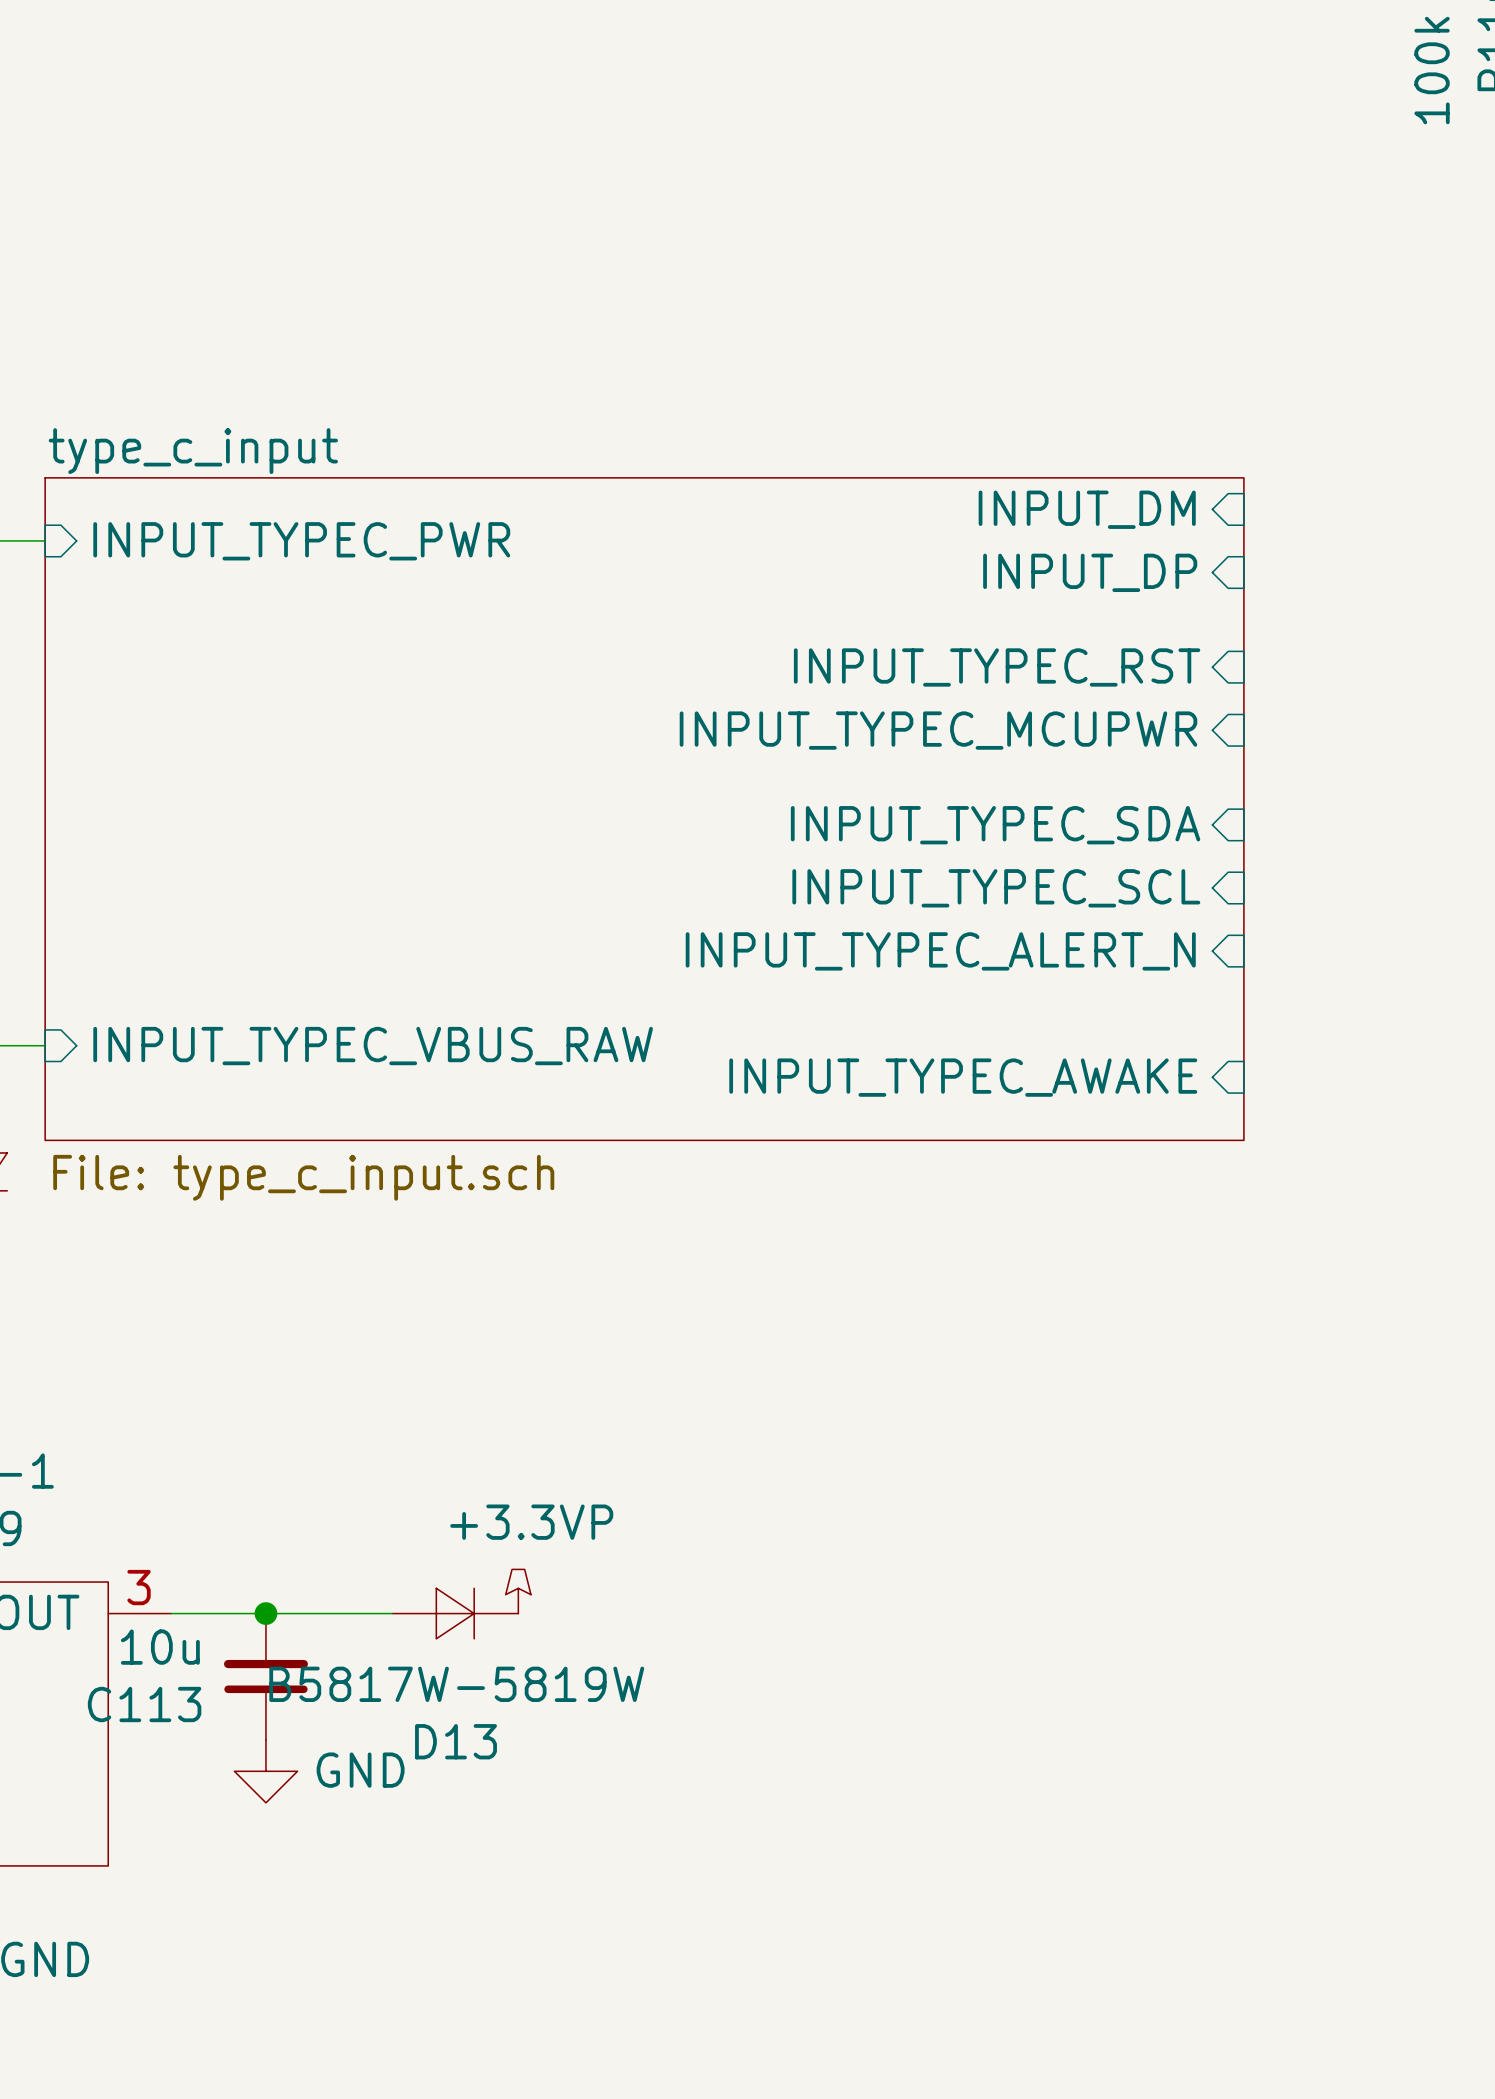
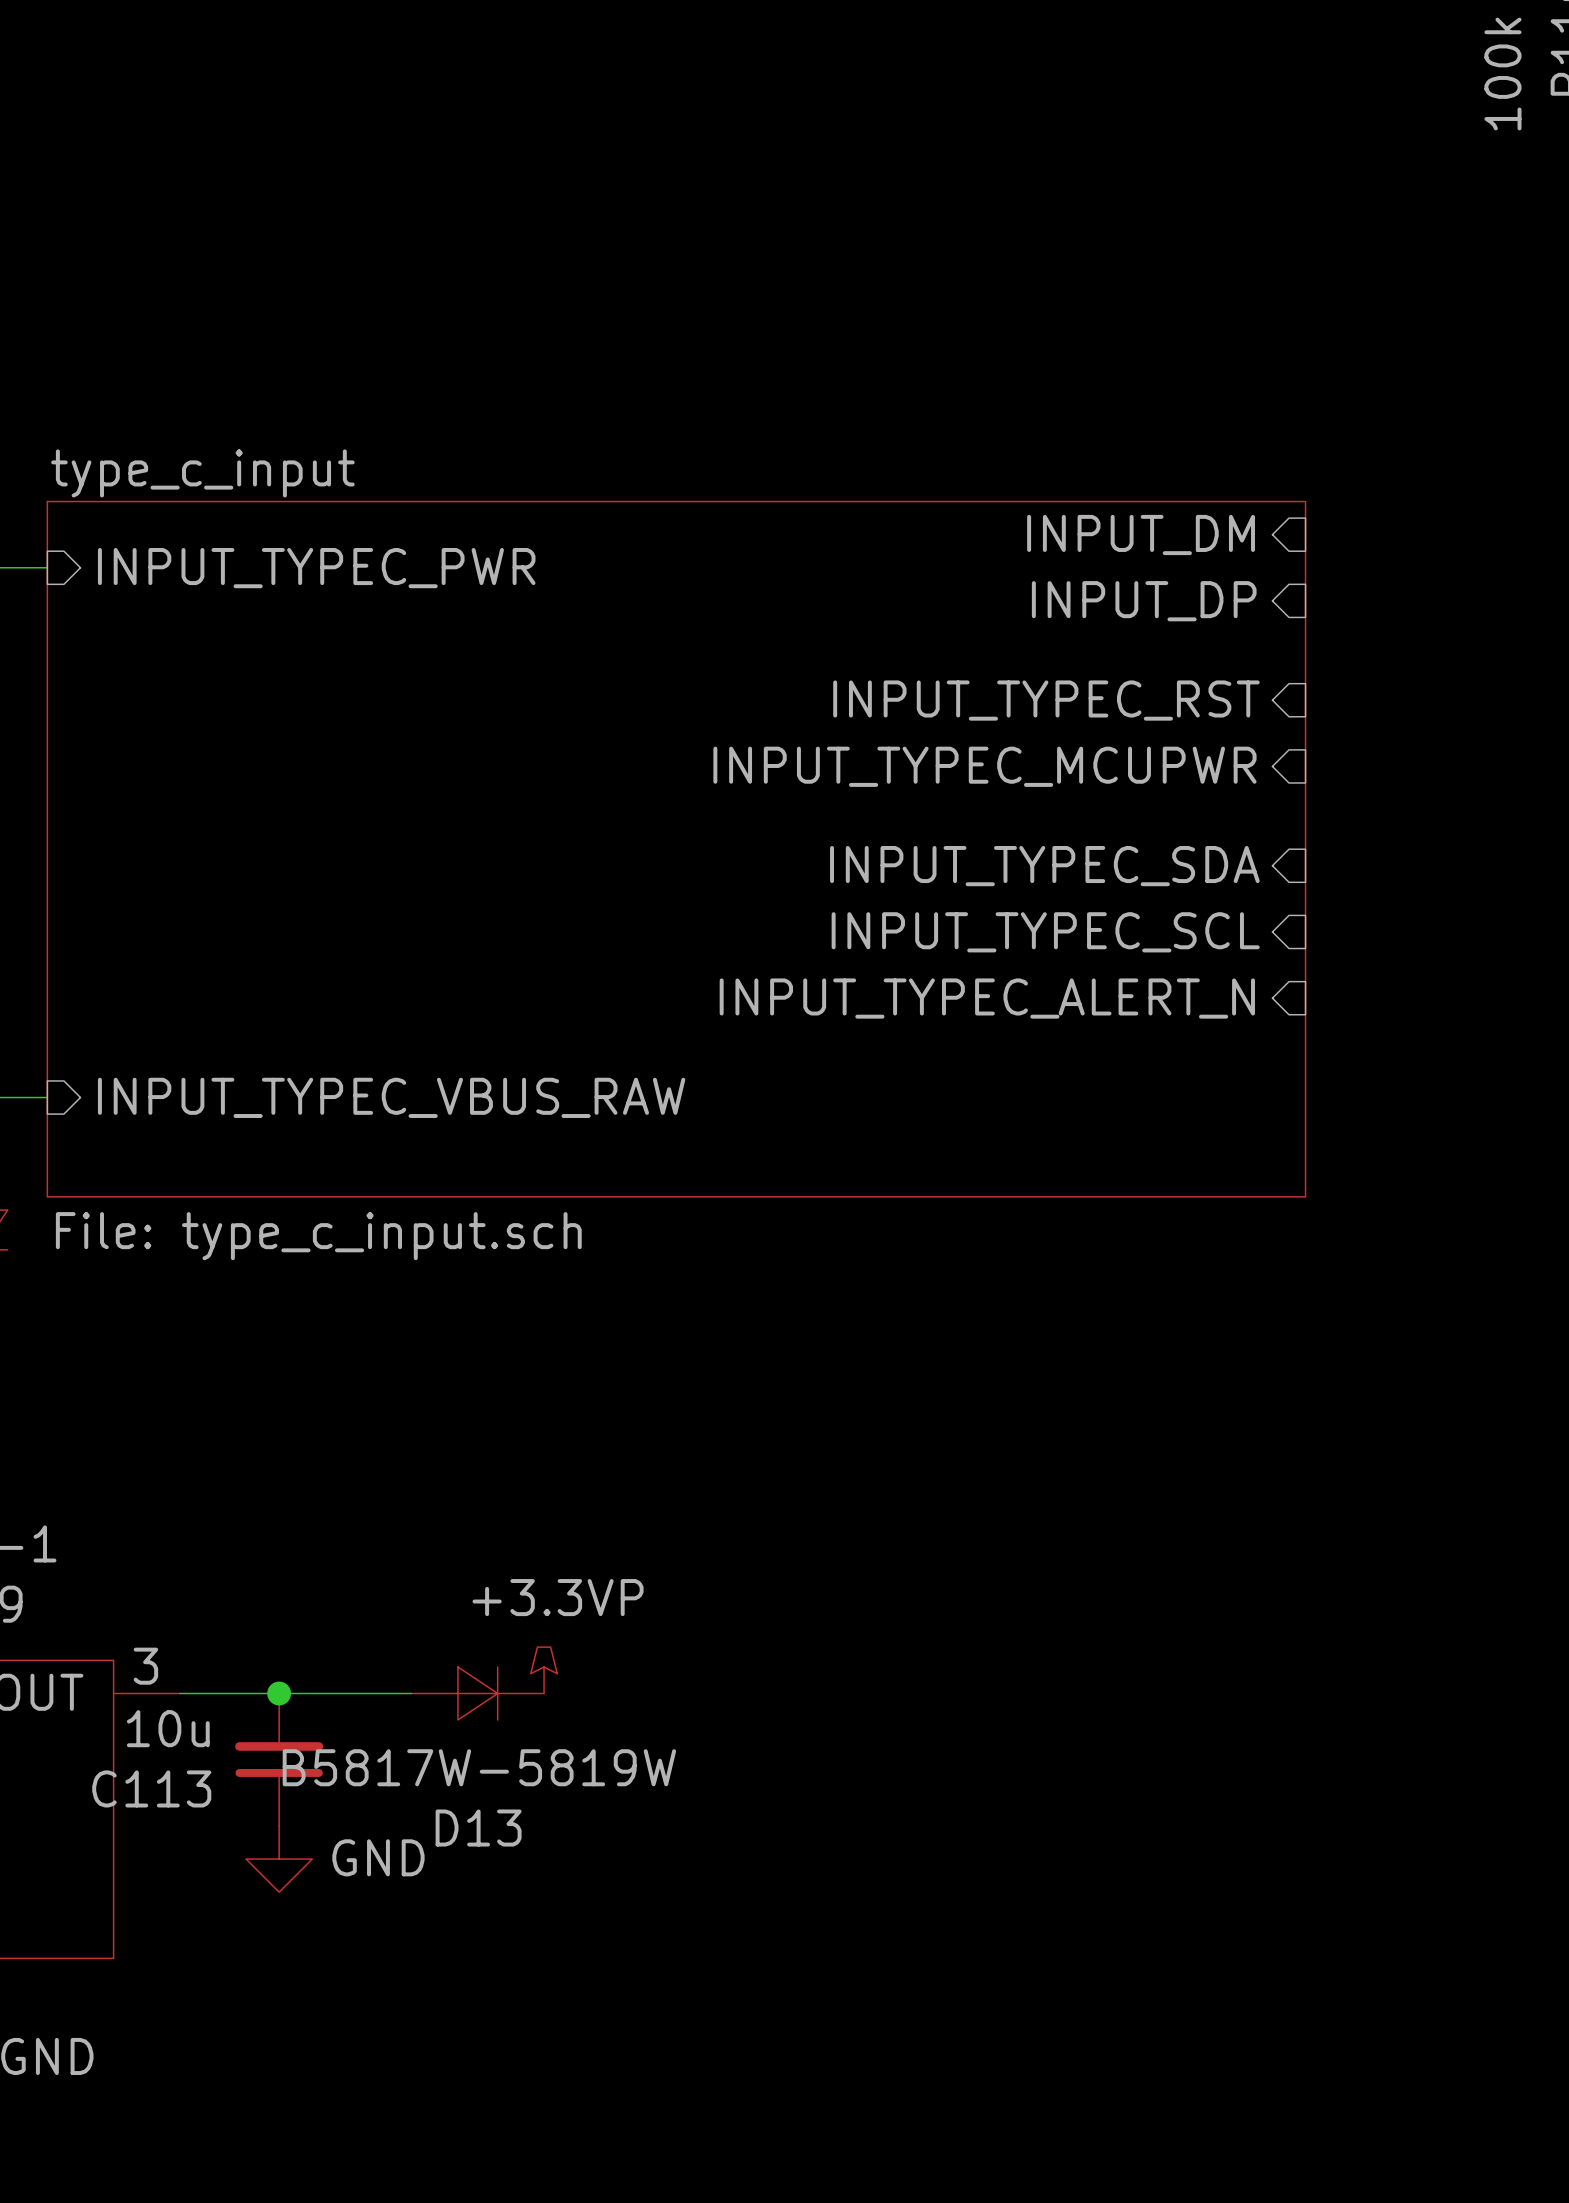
sheet pin: INPUT_TYPEC_AWAKE (963, 1077) -> none

